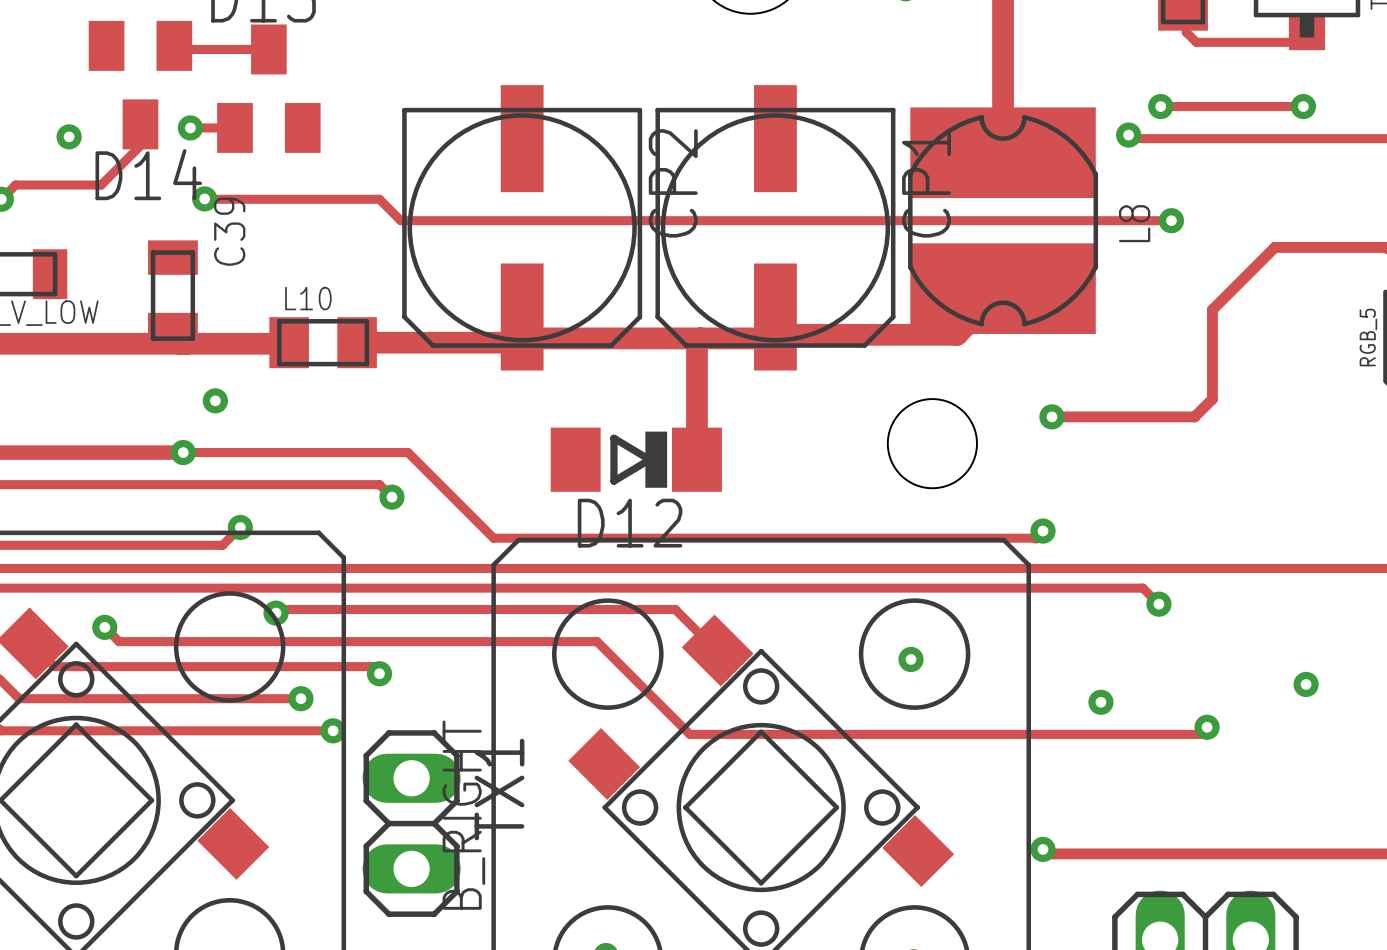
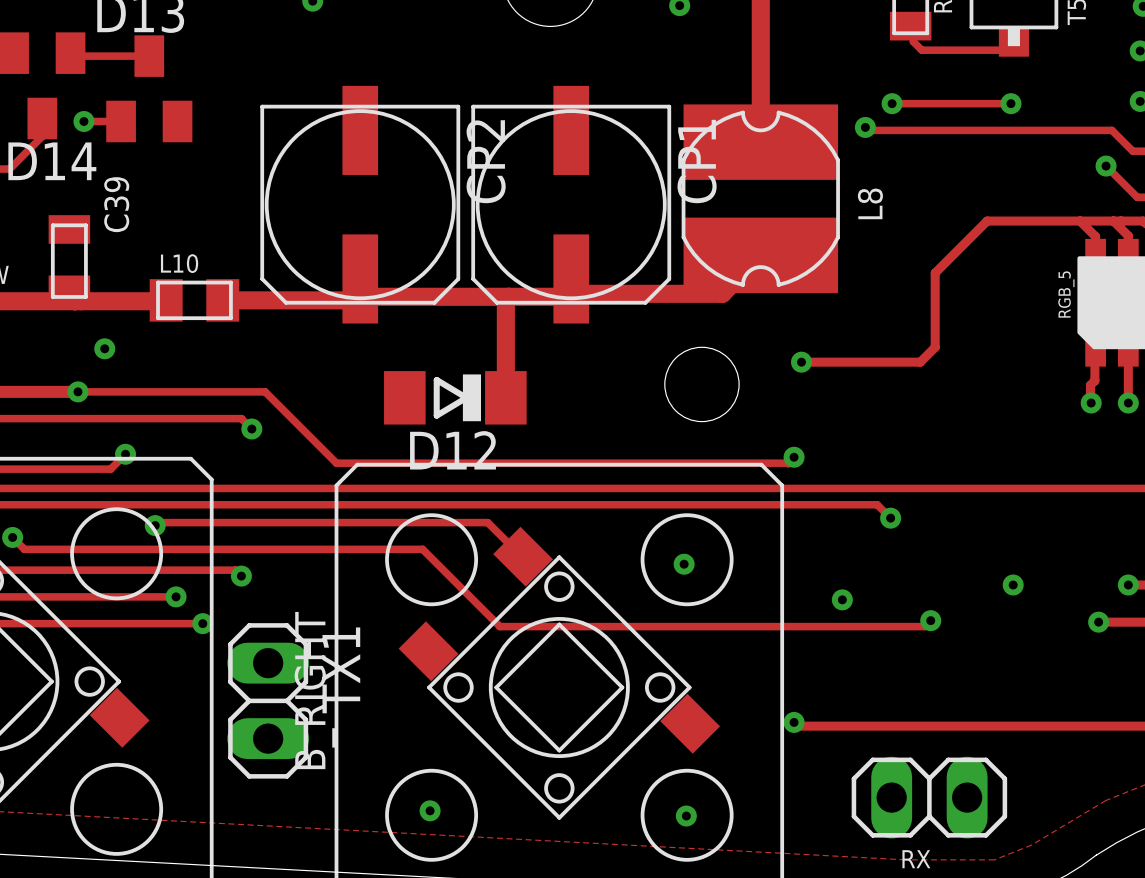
via: (204, 198) -> none
track: (205, 199) (379, 199) (400, 220) (1171, 220) -> none
via: (1171, 220) -> none

